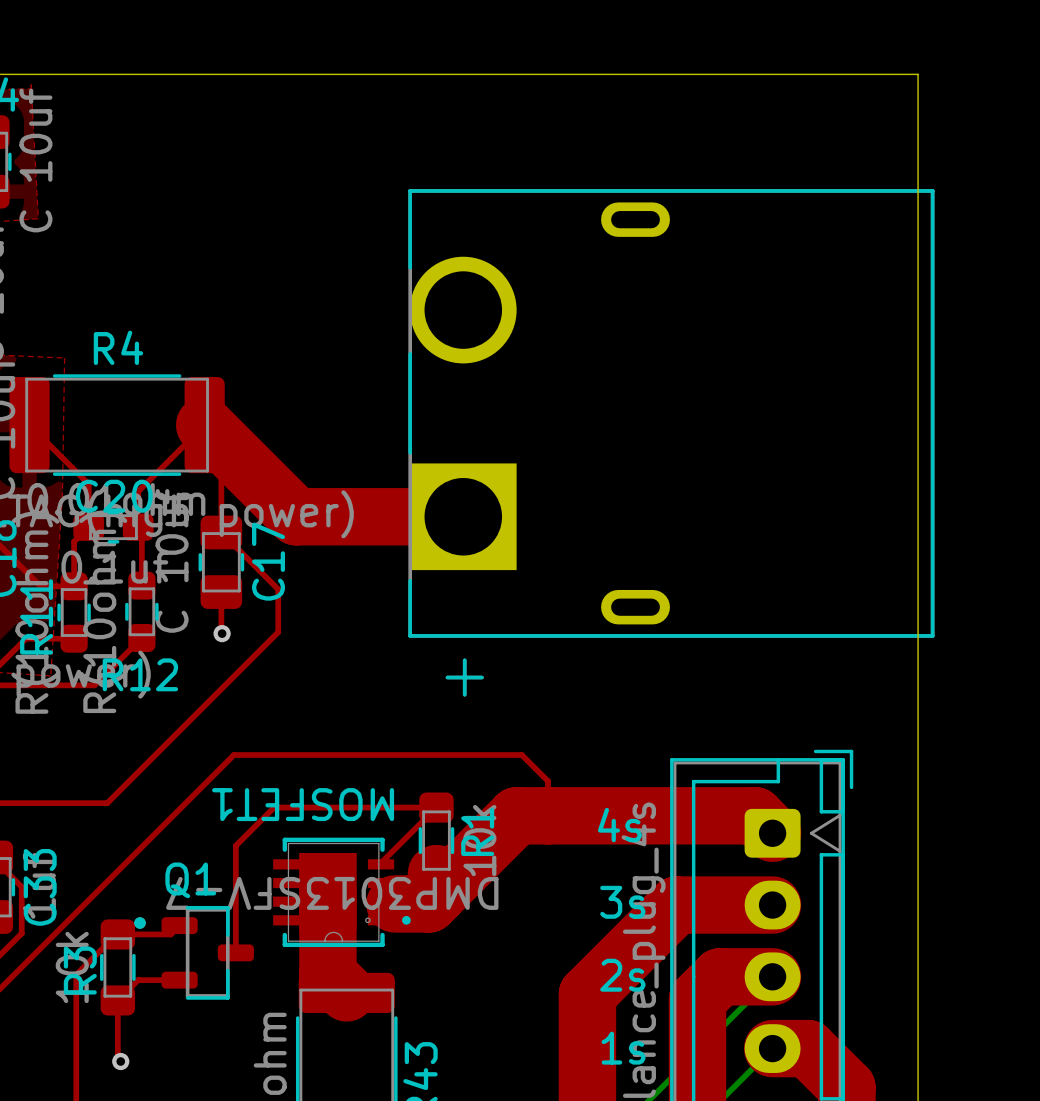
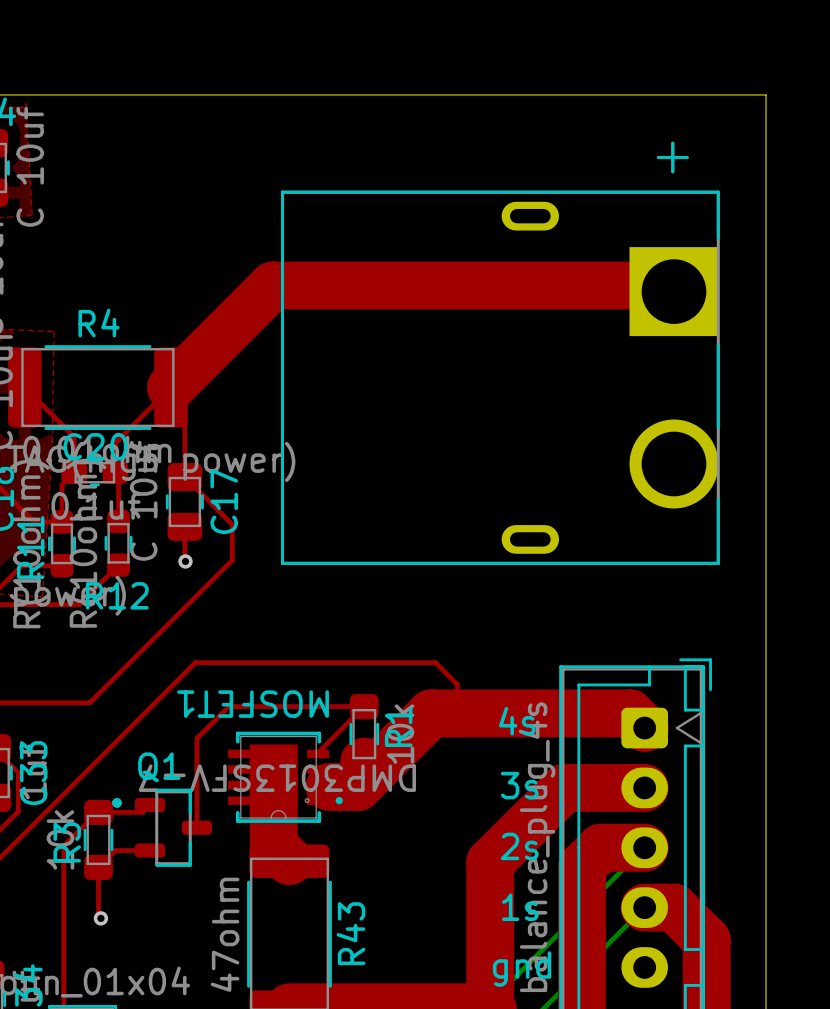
top track: (204, 425) (296, 516) (463, 516) -> (170, 387) (272, 285) (661, 285) (667, 291) (674, 291)
part rotation: 0° (671, 442) -> 180° (500, 353)

